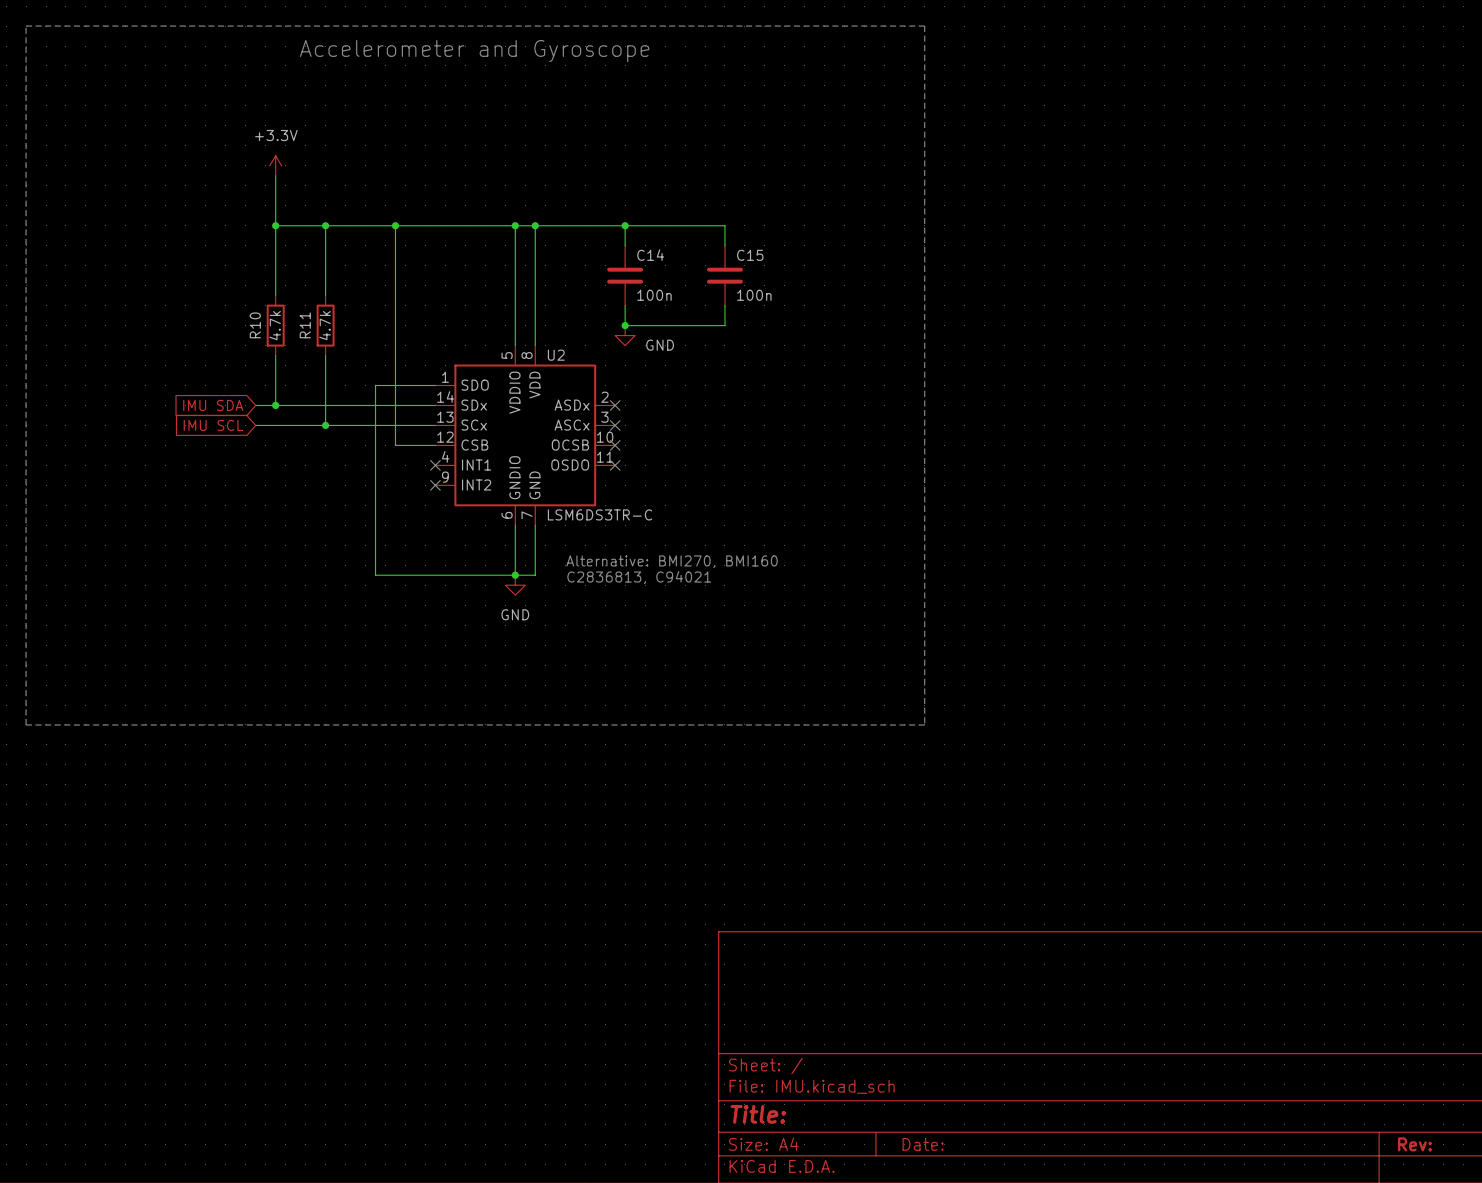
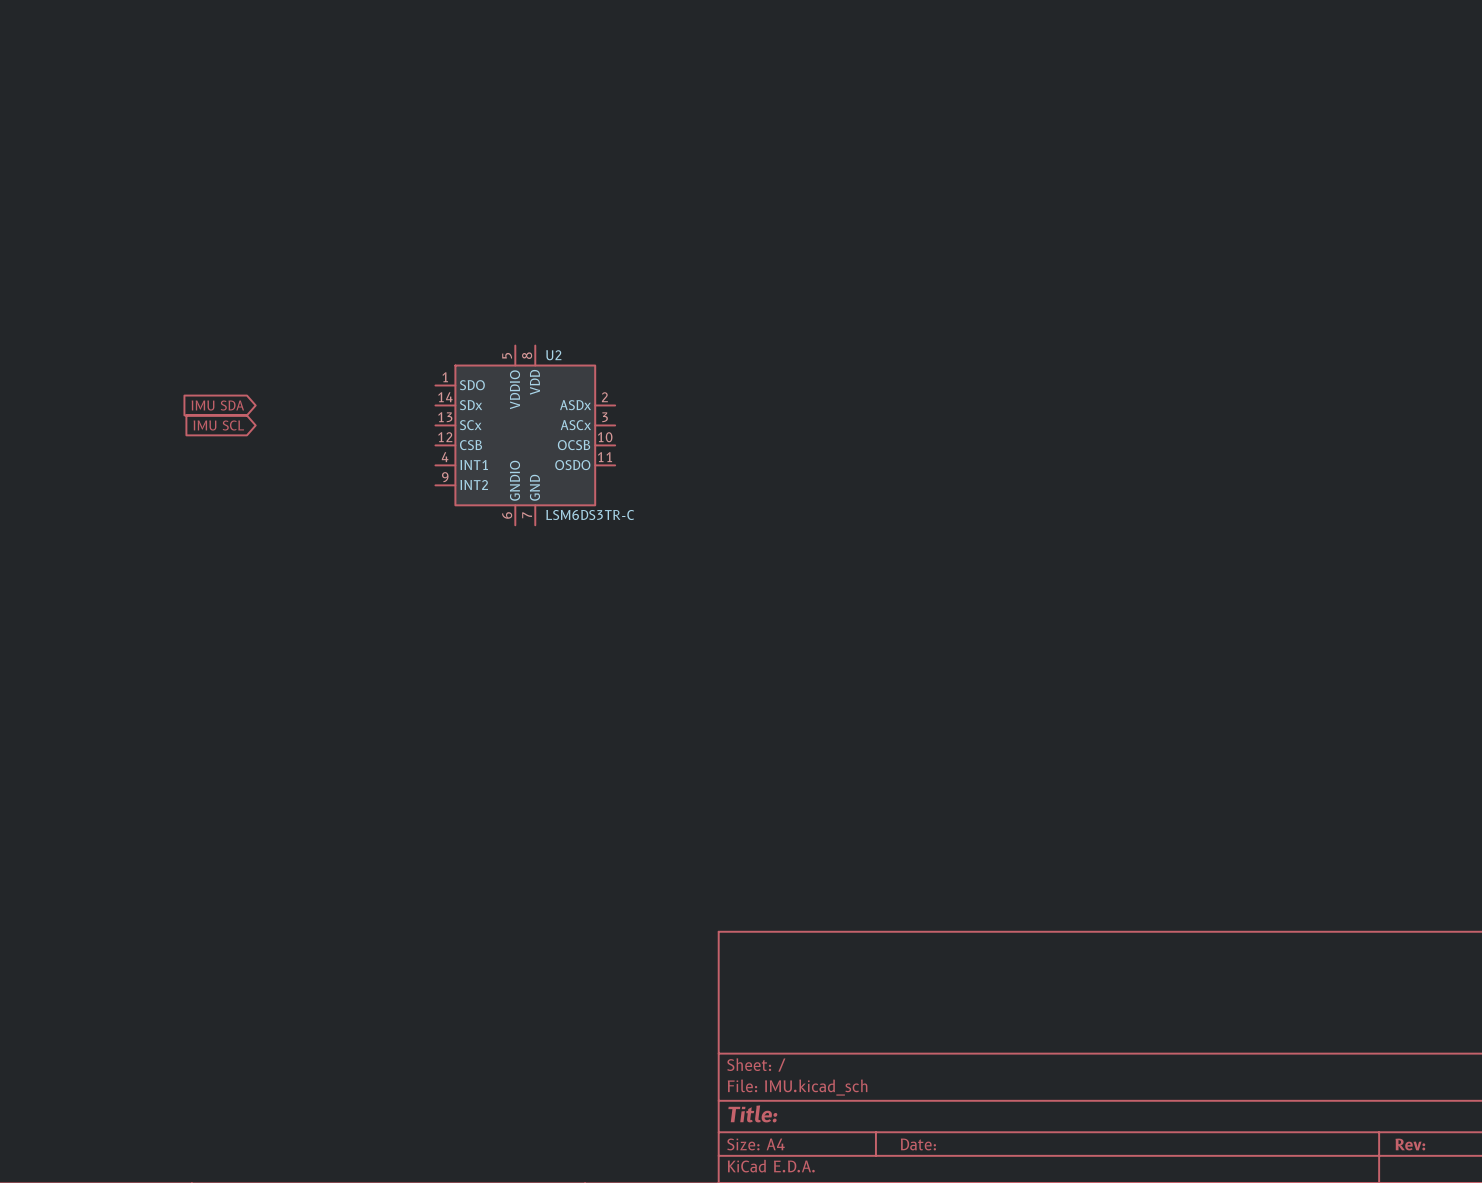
line: (26, 26) (924, 26) (924, 724) (26, 724) (26, 26) -> none
text: Accelerometer and Gyroscope (474, 51) -> none
power symbol: +3.3V (275, 165) -> none
wire: (275, 175) (275, 295) -> none
wire: (275, 225) (724, 225) (724, 245) -> none
junction: (275, 225) -> none
wire: (325, 225) (325, 295) -> none
junction: (325, 225) -> none
wire: (395, 225) (395, 445) (435, 445) -> none
junction: (395, 225) -> none
wire: (515, 225) (515, 345) -> none
junction: (515, 225) -> none
wire: (535, 225) (535, 345) -> none
junction: (535, 225) -> none
wire: (625, 225) (625, 245) -> none
junction: (625, 225) -> none
C14: 100n (625, 275) -> none
C15: 100n (724, 275) -> none
wire: (625, 305) (625, 325) (724, 325) (724, 305) -> none
R10: 4.7k (275, 325) -> none
R11: 4.7k (325, 325) -> none
junction: (625, 325) -> none
power symbol: GND (625, 335) -> none
wire: (275, 355) (275, 405) -> none
wire: (325, 355) (325, 425) -> none
wire: (435, 385) (375, 385) (375, 575) (535, 575) (535, 525) -> none
wire: (255, 405) (435, 405) -> none
junction: (275, 405) -> none
no-connect mark: (615, 405) -> none
wire: (255, 425) (435, 425) -> none
junction: (325, 425) -> none
no-connect mark: (615, 425) -> none
no-connect mark: (615, 445) -> none
no-connect mark: (435, 465) -> none
no-connect mark: (615, 465) -> none
no-connect mark: (435, 485) -> none
wire: (515, 525) (515, 575) -> none
text: Alternative: BMI270, BMI160 (672, 561) -> none
junction: (515, 575) -> none
text: C2836813, C94021 (639, 577) -> none
power symbol: GND (515, 585) -> none

